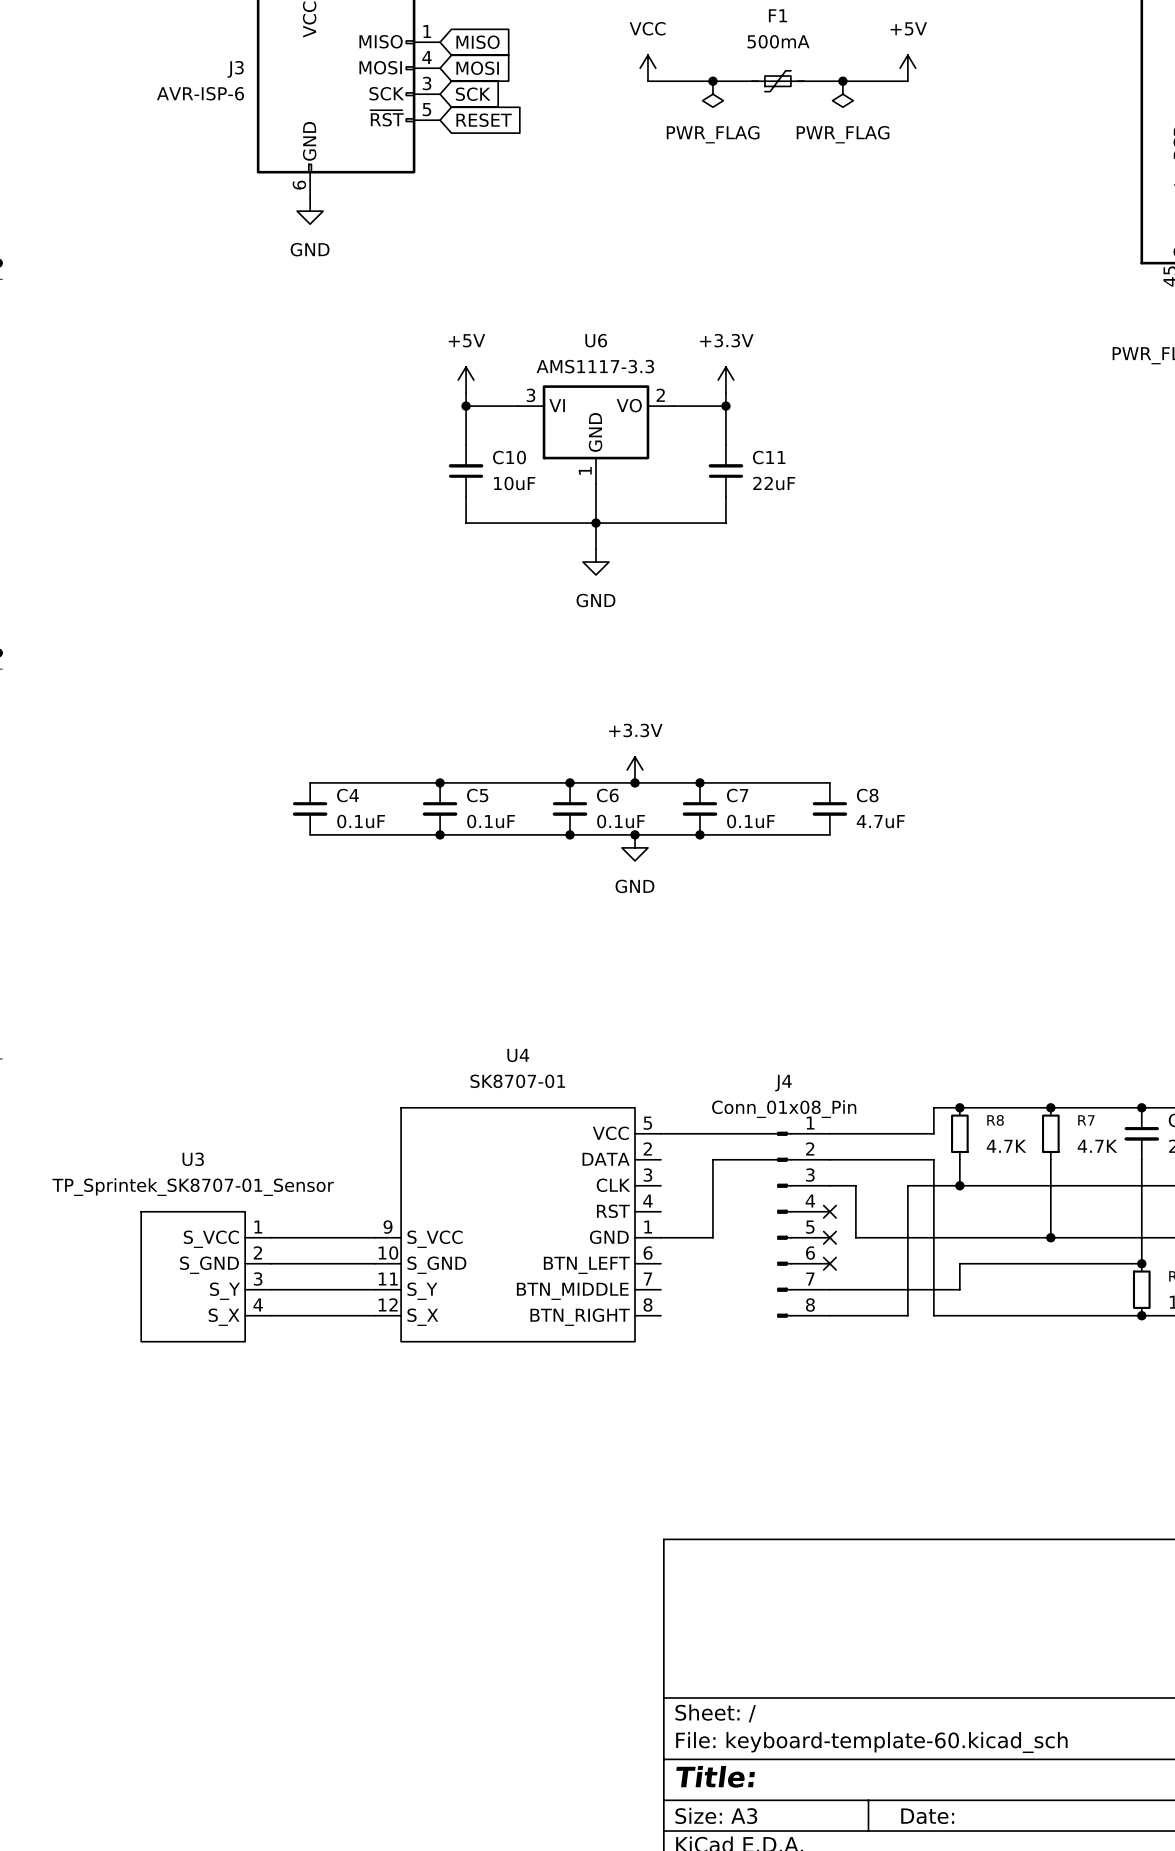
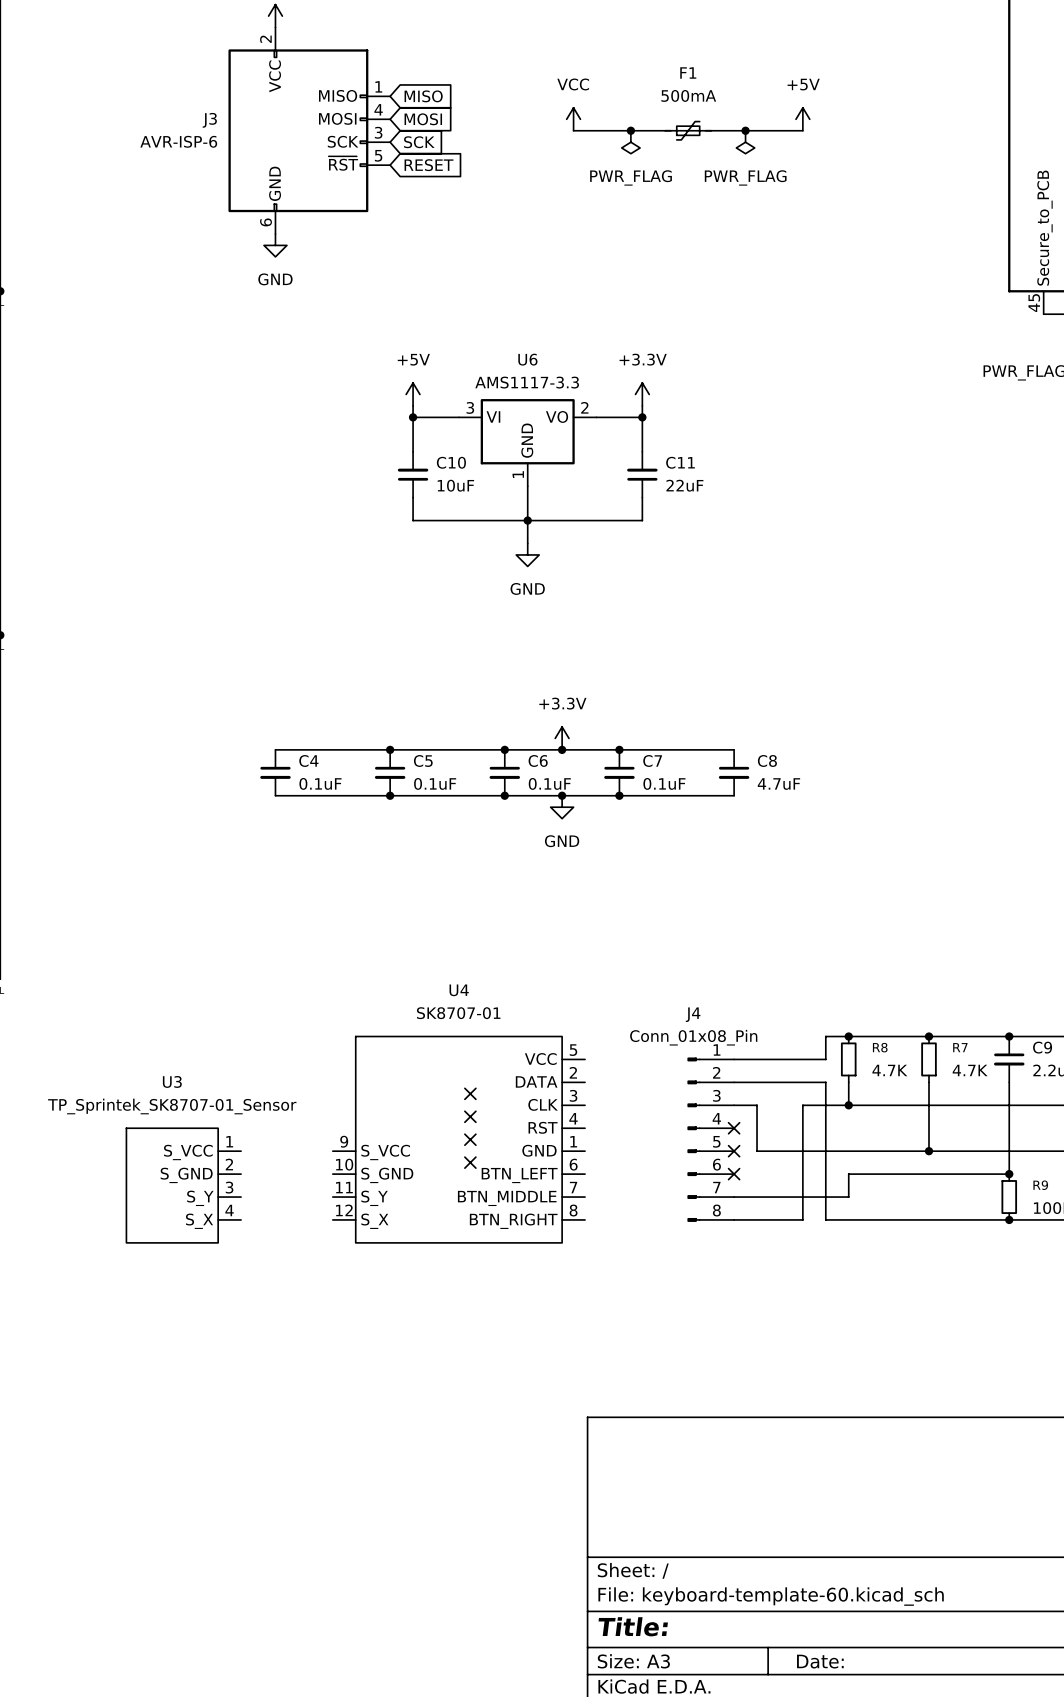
wire: (660, 1133) (777, 1133) -> none
wire: (777, 1159) (712, 1159) (712, 1237) (660, 1237) -> none
no-connect mark: none -> (470, 1093)
no-connect mark: none -> (470, 1116)
no-connect mark: none -> (470, 1139)
wire: (271, 1237) (375, 1237) -> none
no-connect mark: none -> (470, 1162)
wire: (271, 1263) (375, 1263) -> none
wire: (271, 1289) (375, 1289) -> none
wire: (271, 1315) (375, 1315) -> none

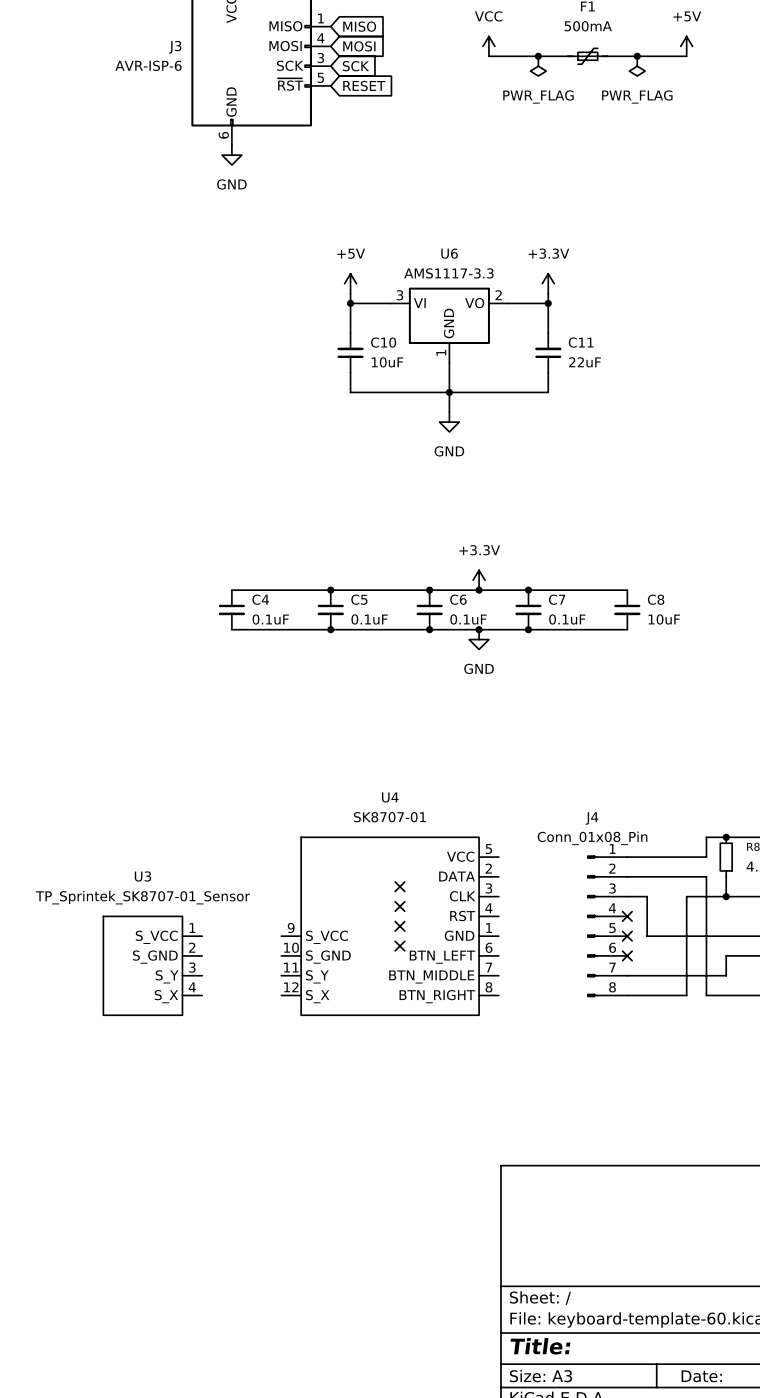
C8 value: 4.7uF (778, 784) -> 10uF (664, 619)

